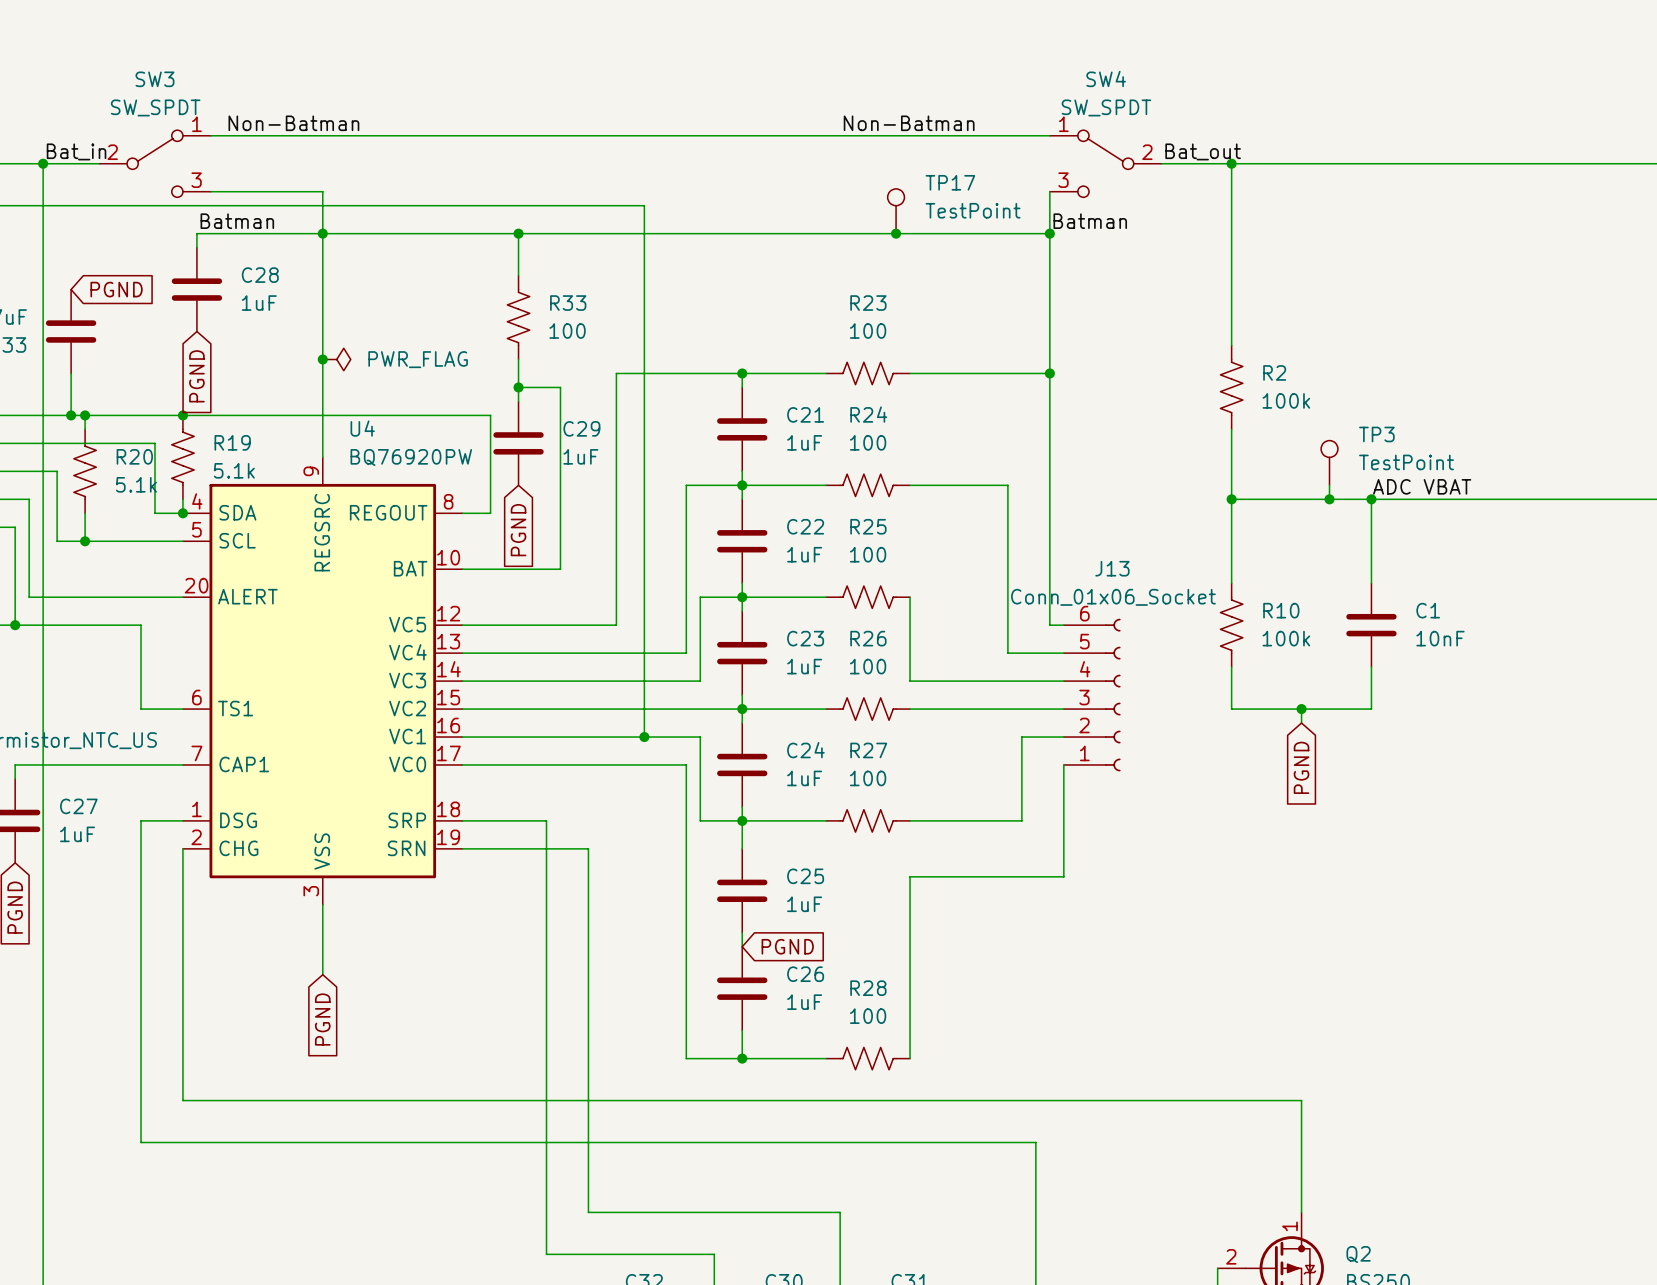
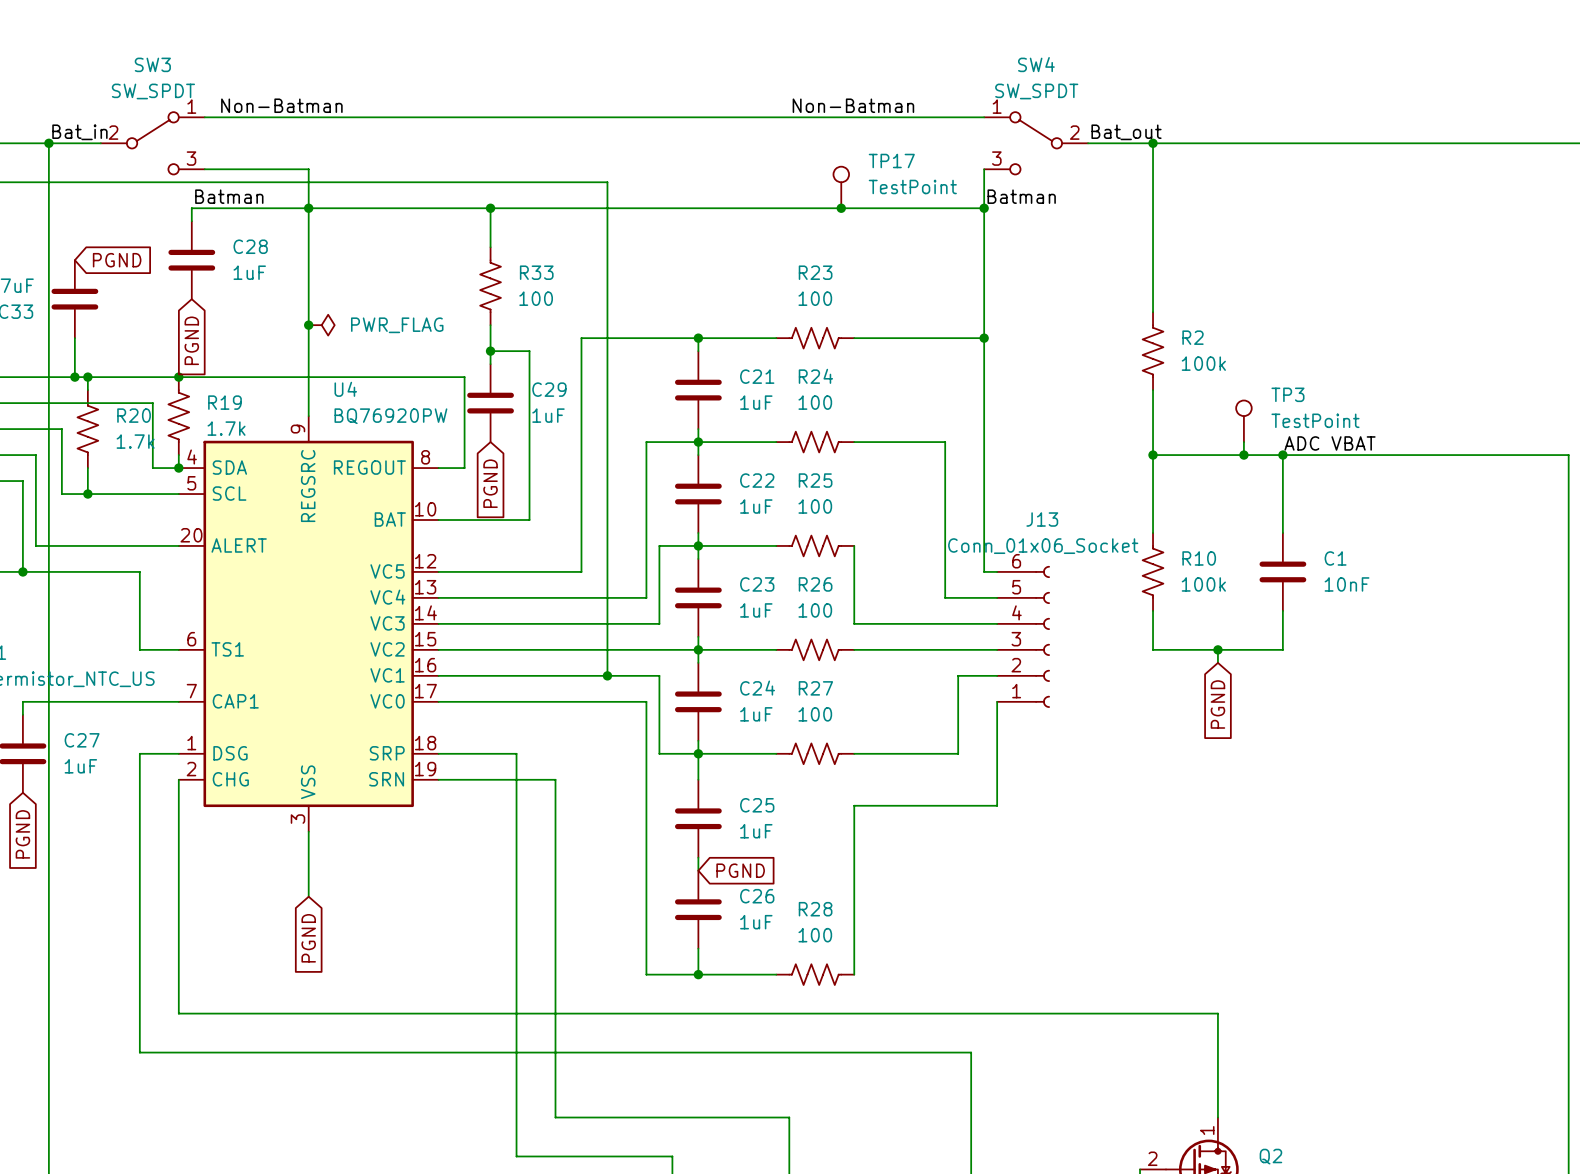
R19 value: 5.1k (234, 470) -> 1.7k (226, 428)
R20 value: 5.1k (136, 484) -> 1.7k (135, 441)

